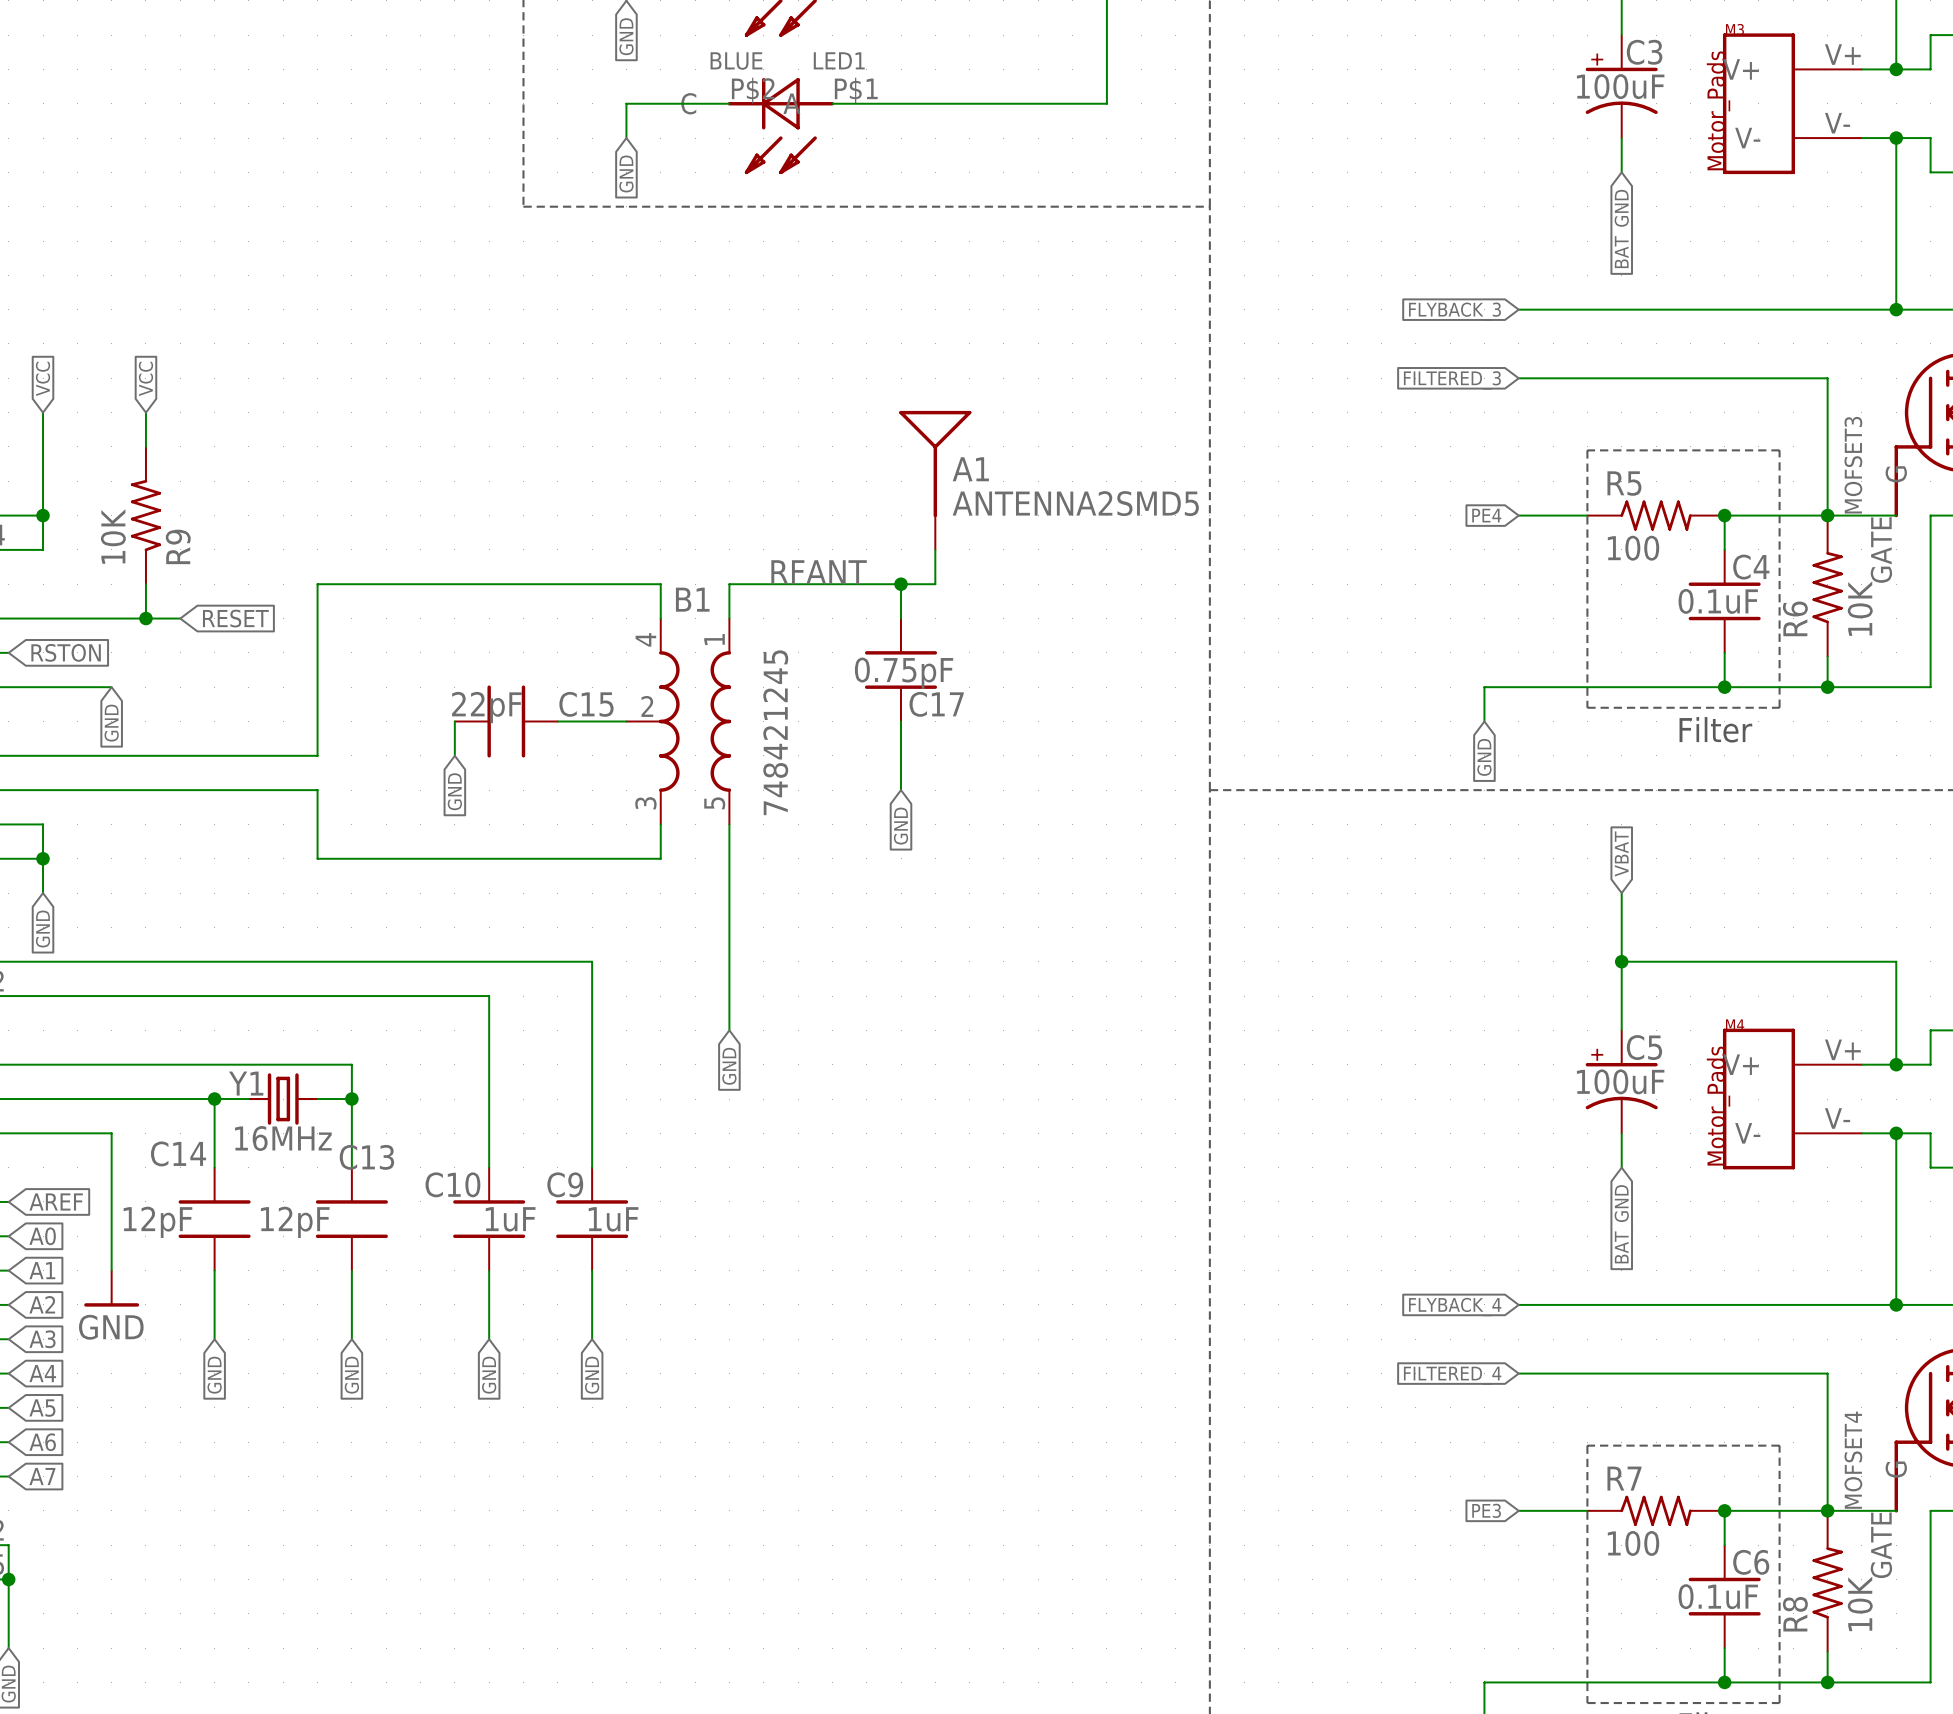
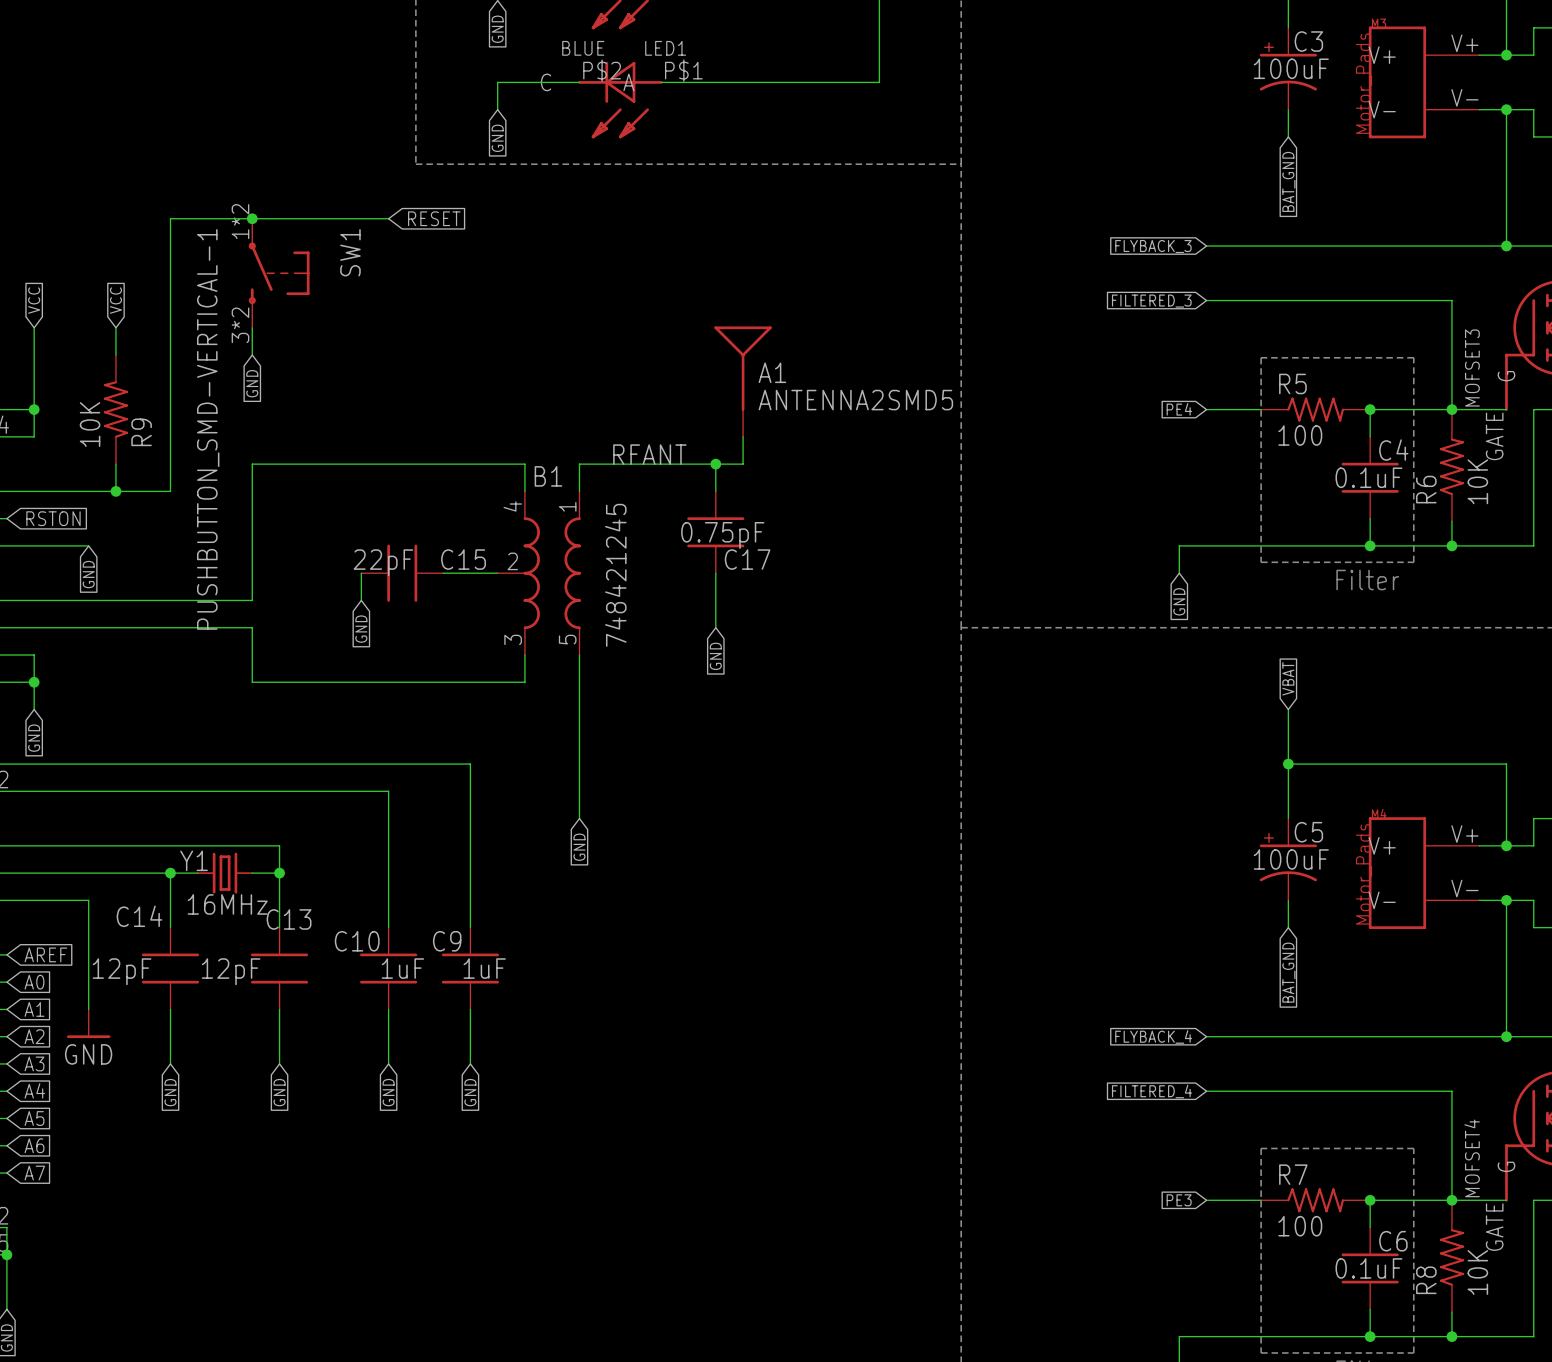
junction: none -> (252, 218)
wire: none -> (388, 218) (170, 218) (170, 491) (143, 491)
global label: none -> RESET (434, 218)
SW1: none -> PUSHBUTTON_SMD-VERTICAL-1 (279, 273)
wire: none -> (252, 327) (252, 355)
global label: none -> GND (252, 383)
global label: RESET (235, 618) -> none

